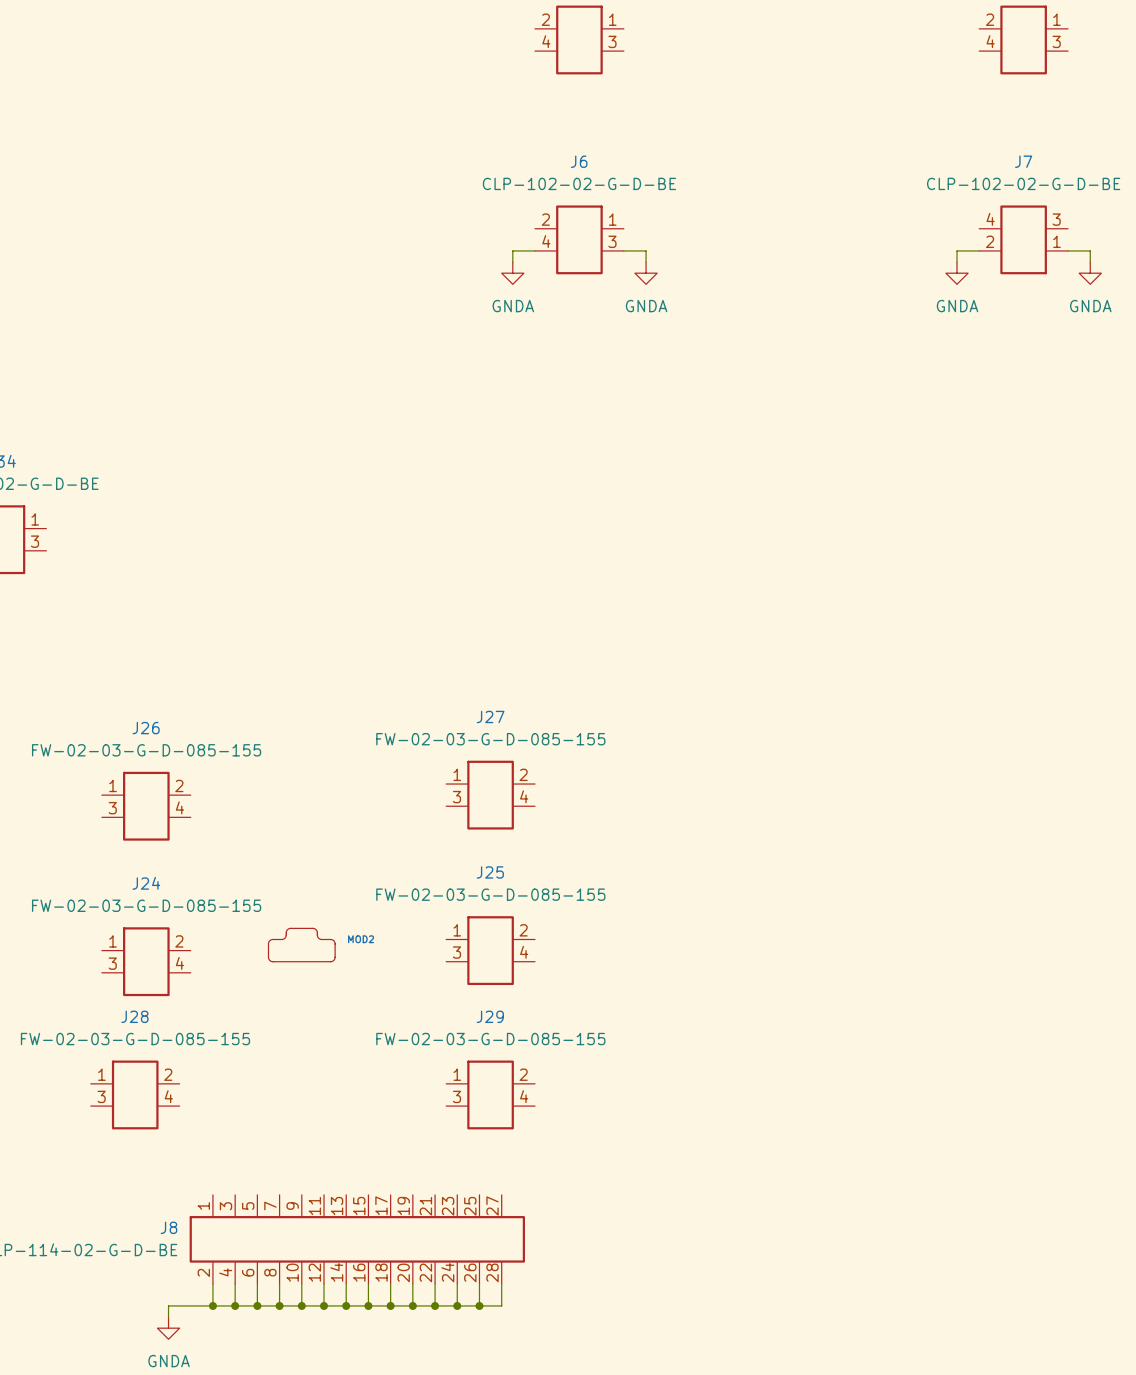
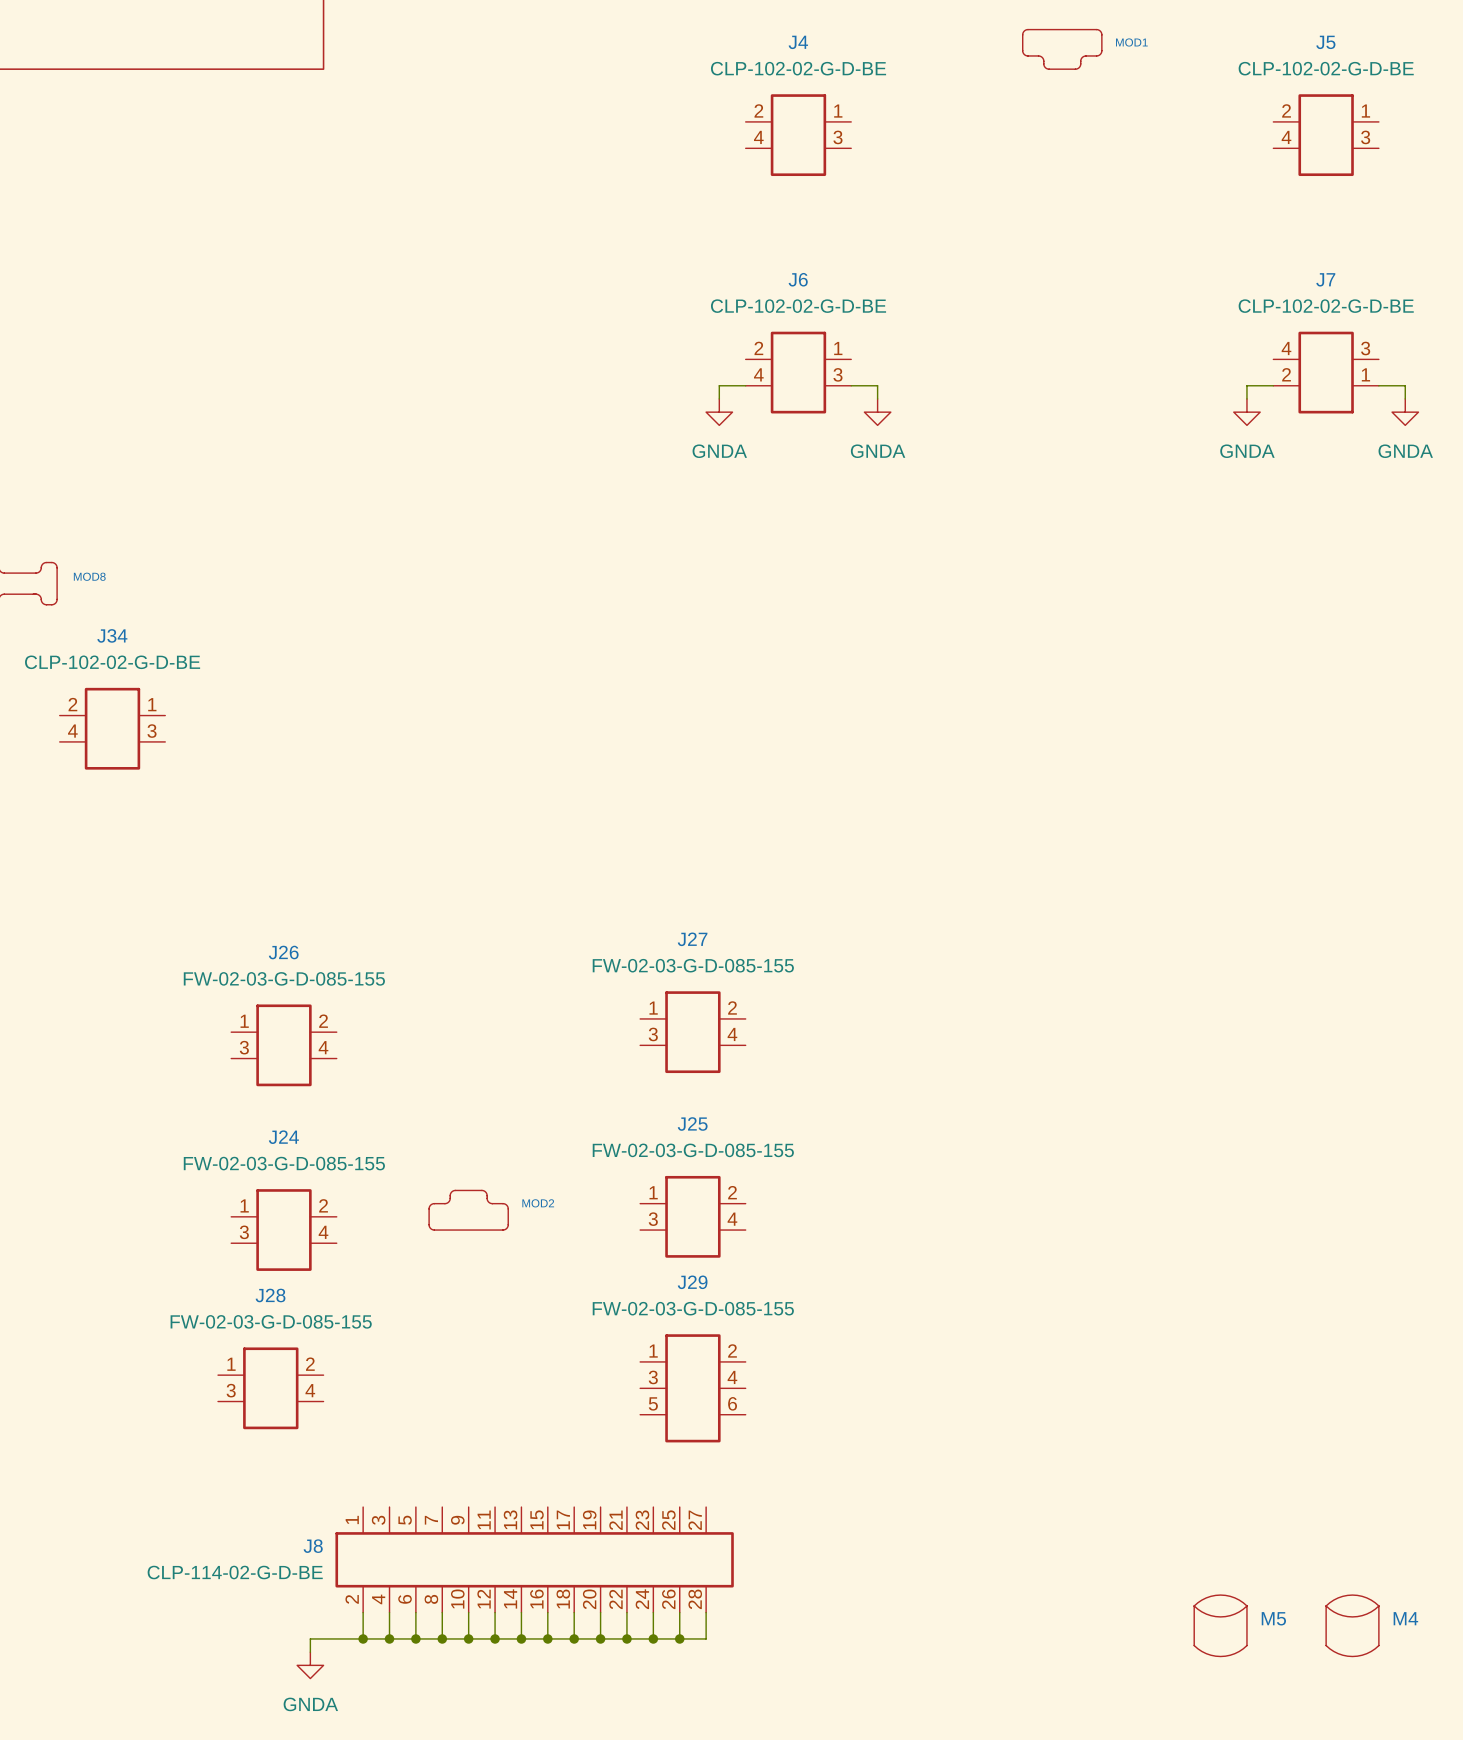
J29 symbol: [446, 1060, 536, 1130] -> [640, 1334, 746, 1443]
M5: none -> (1220, 1625)
M4: none -> (1352, 1625)

